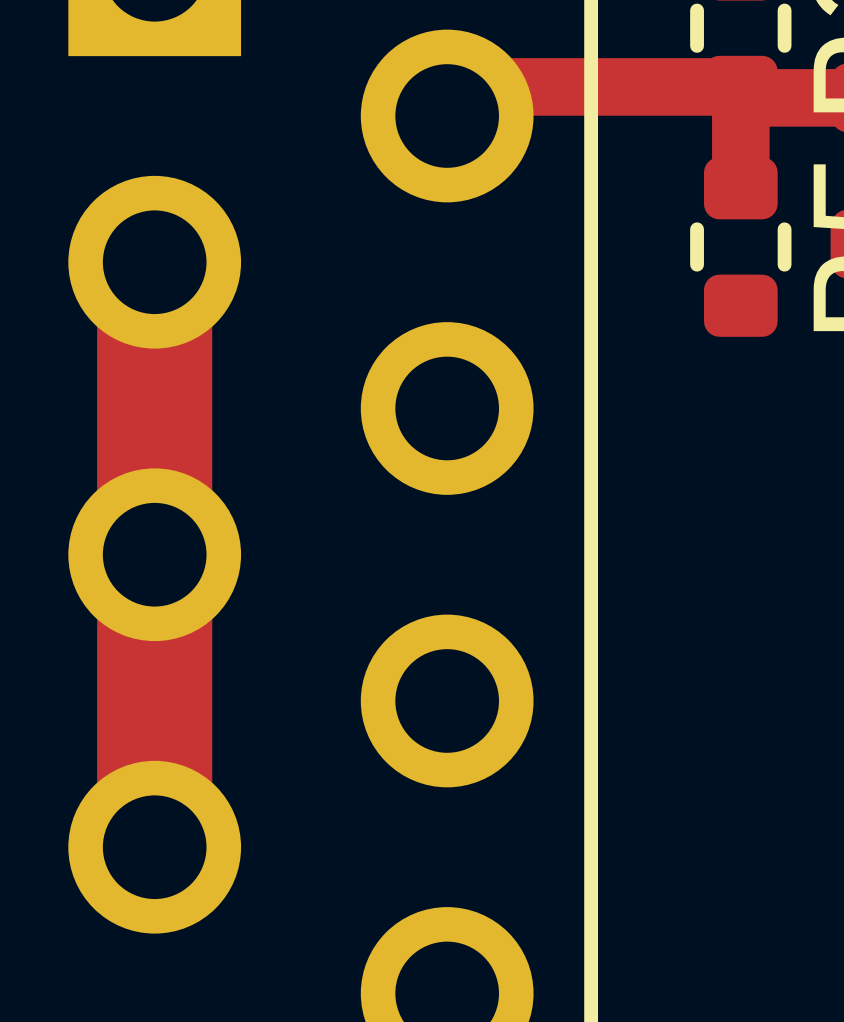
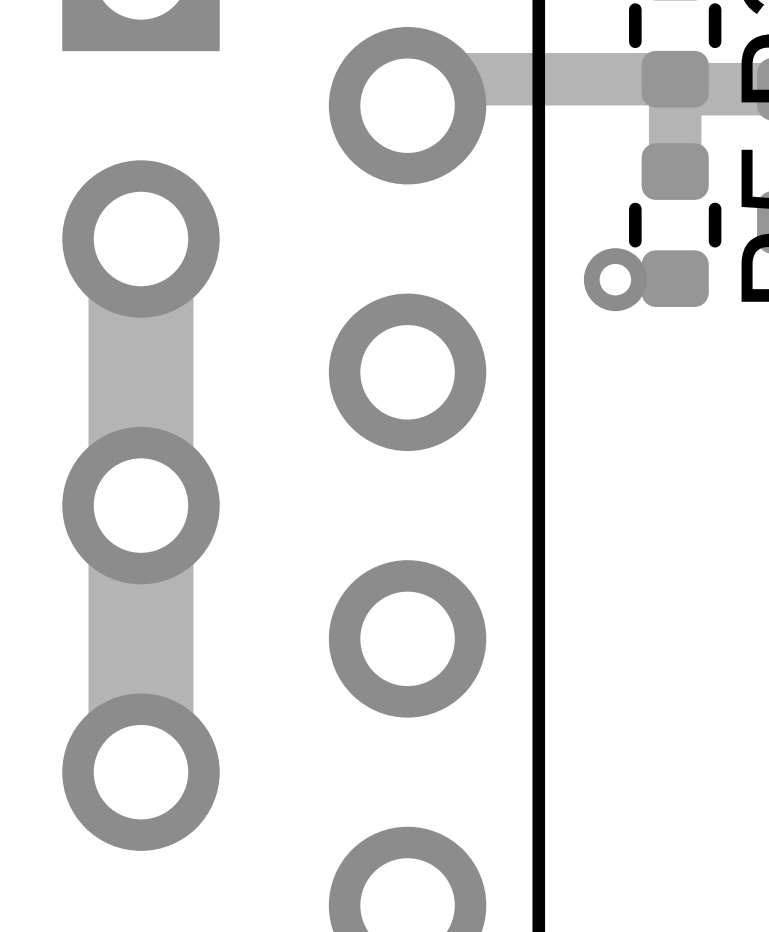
via: none -> (615, 279)

